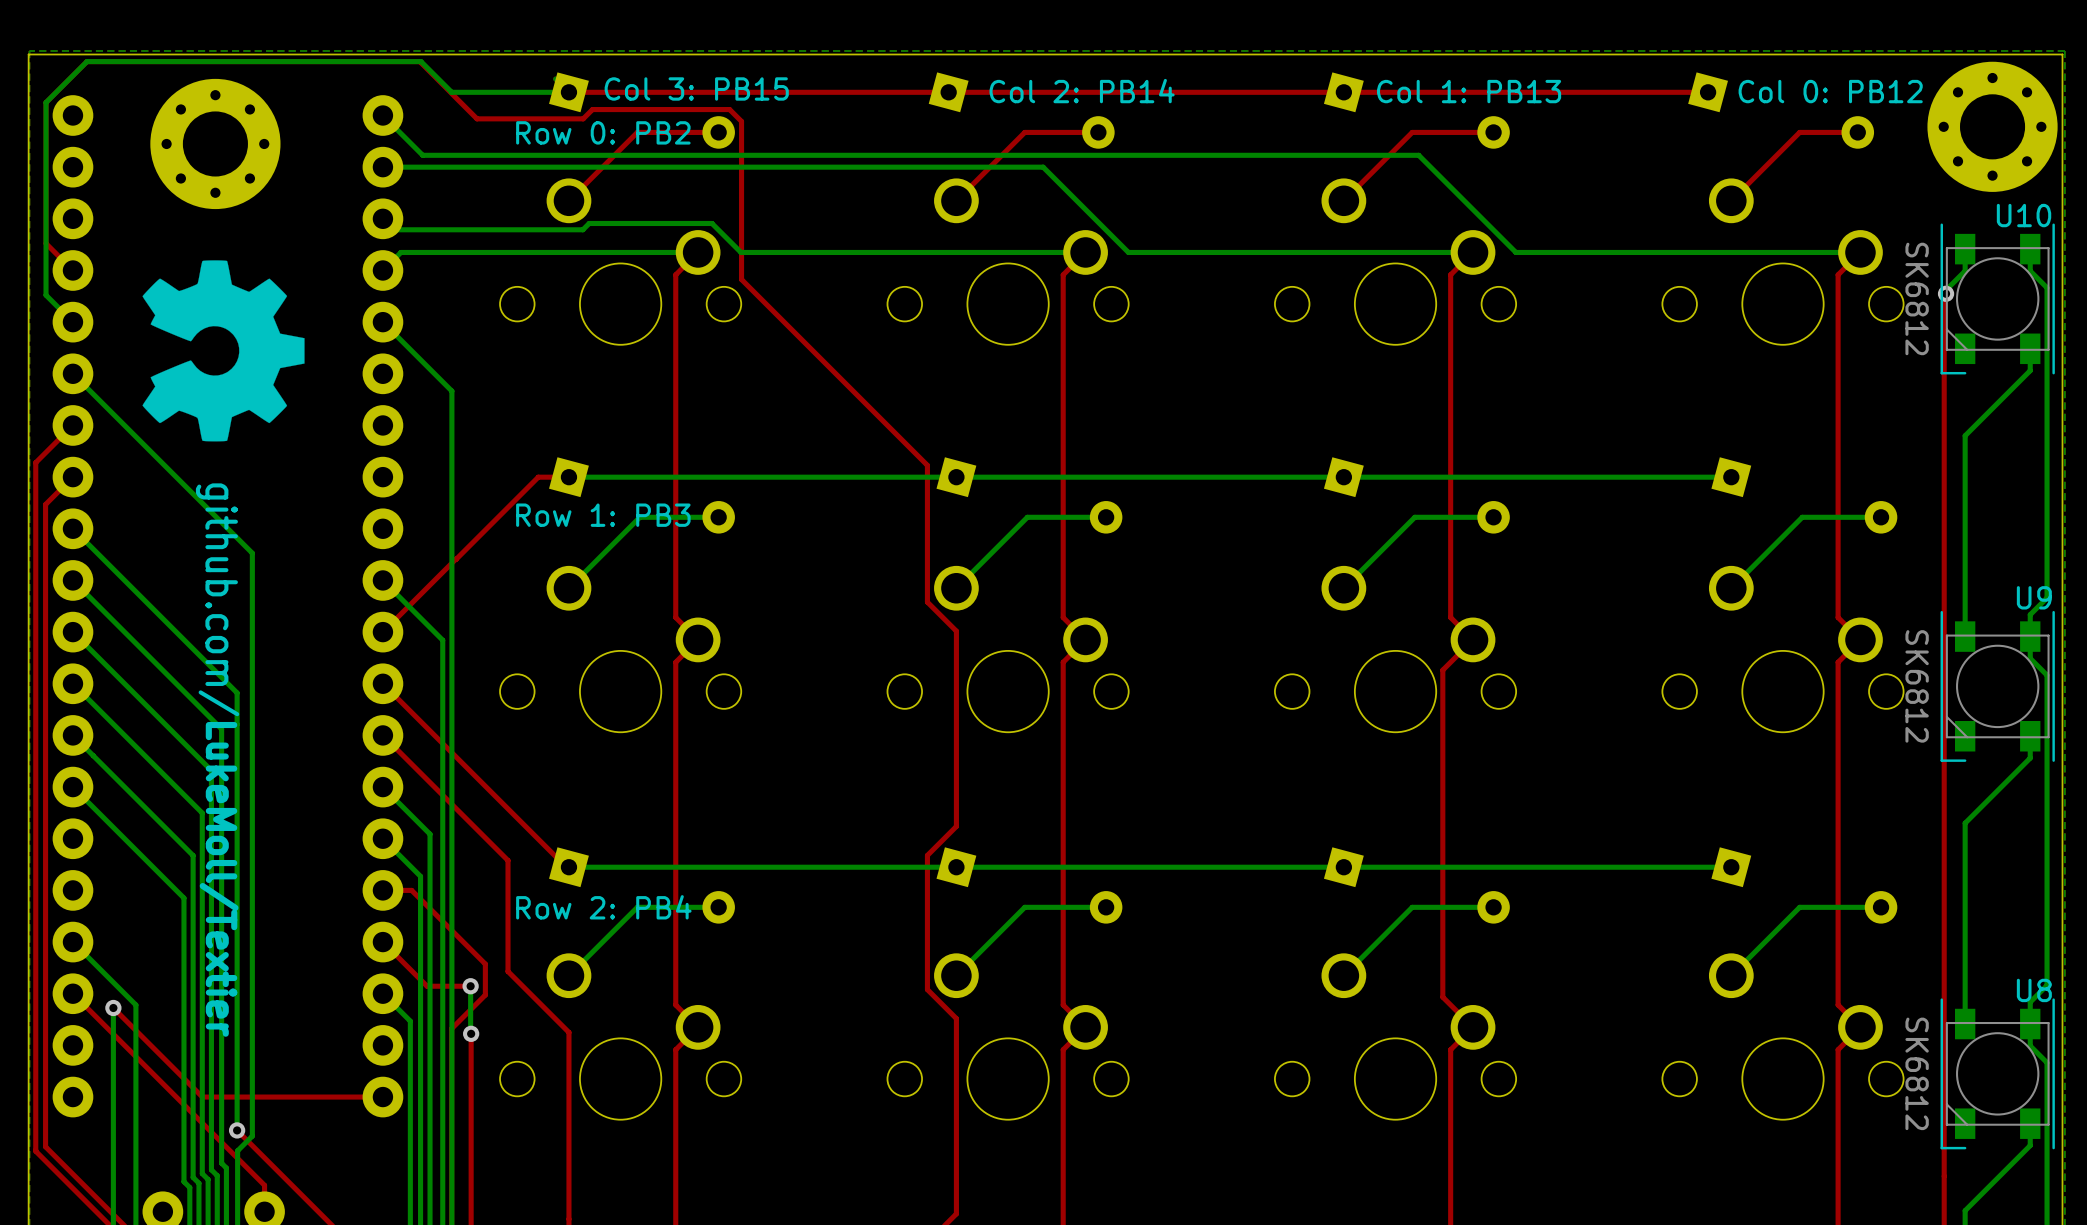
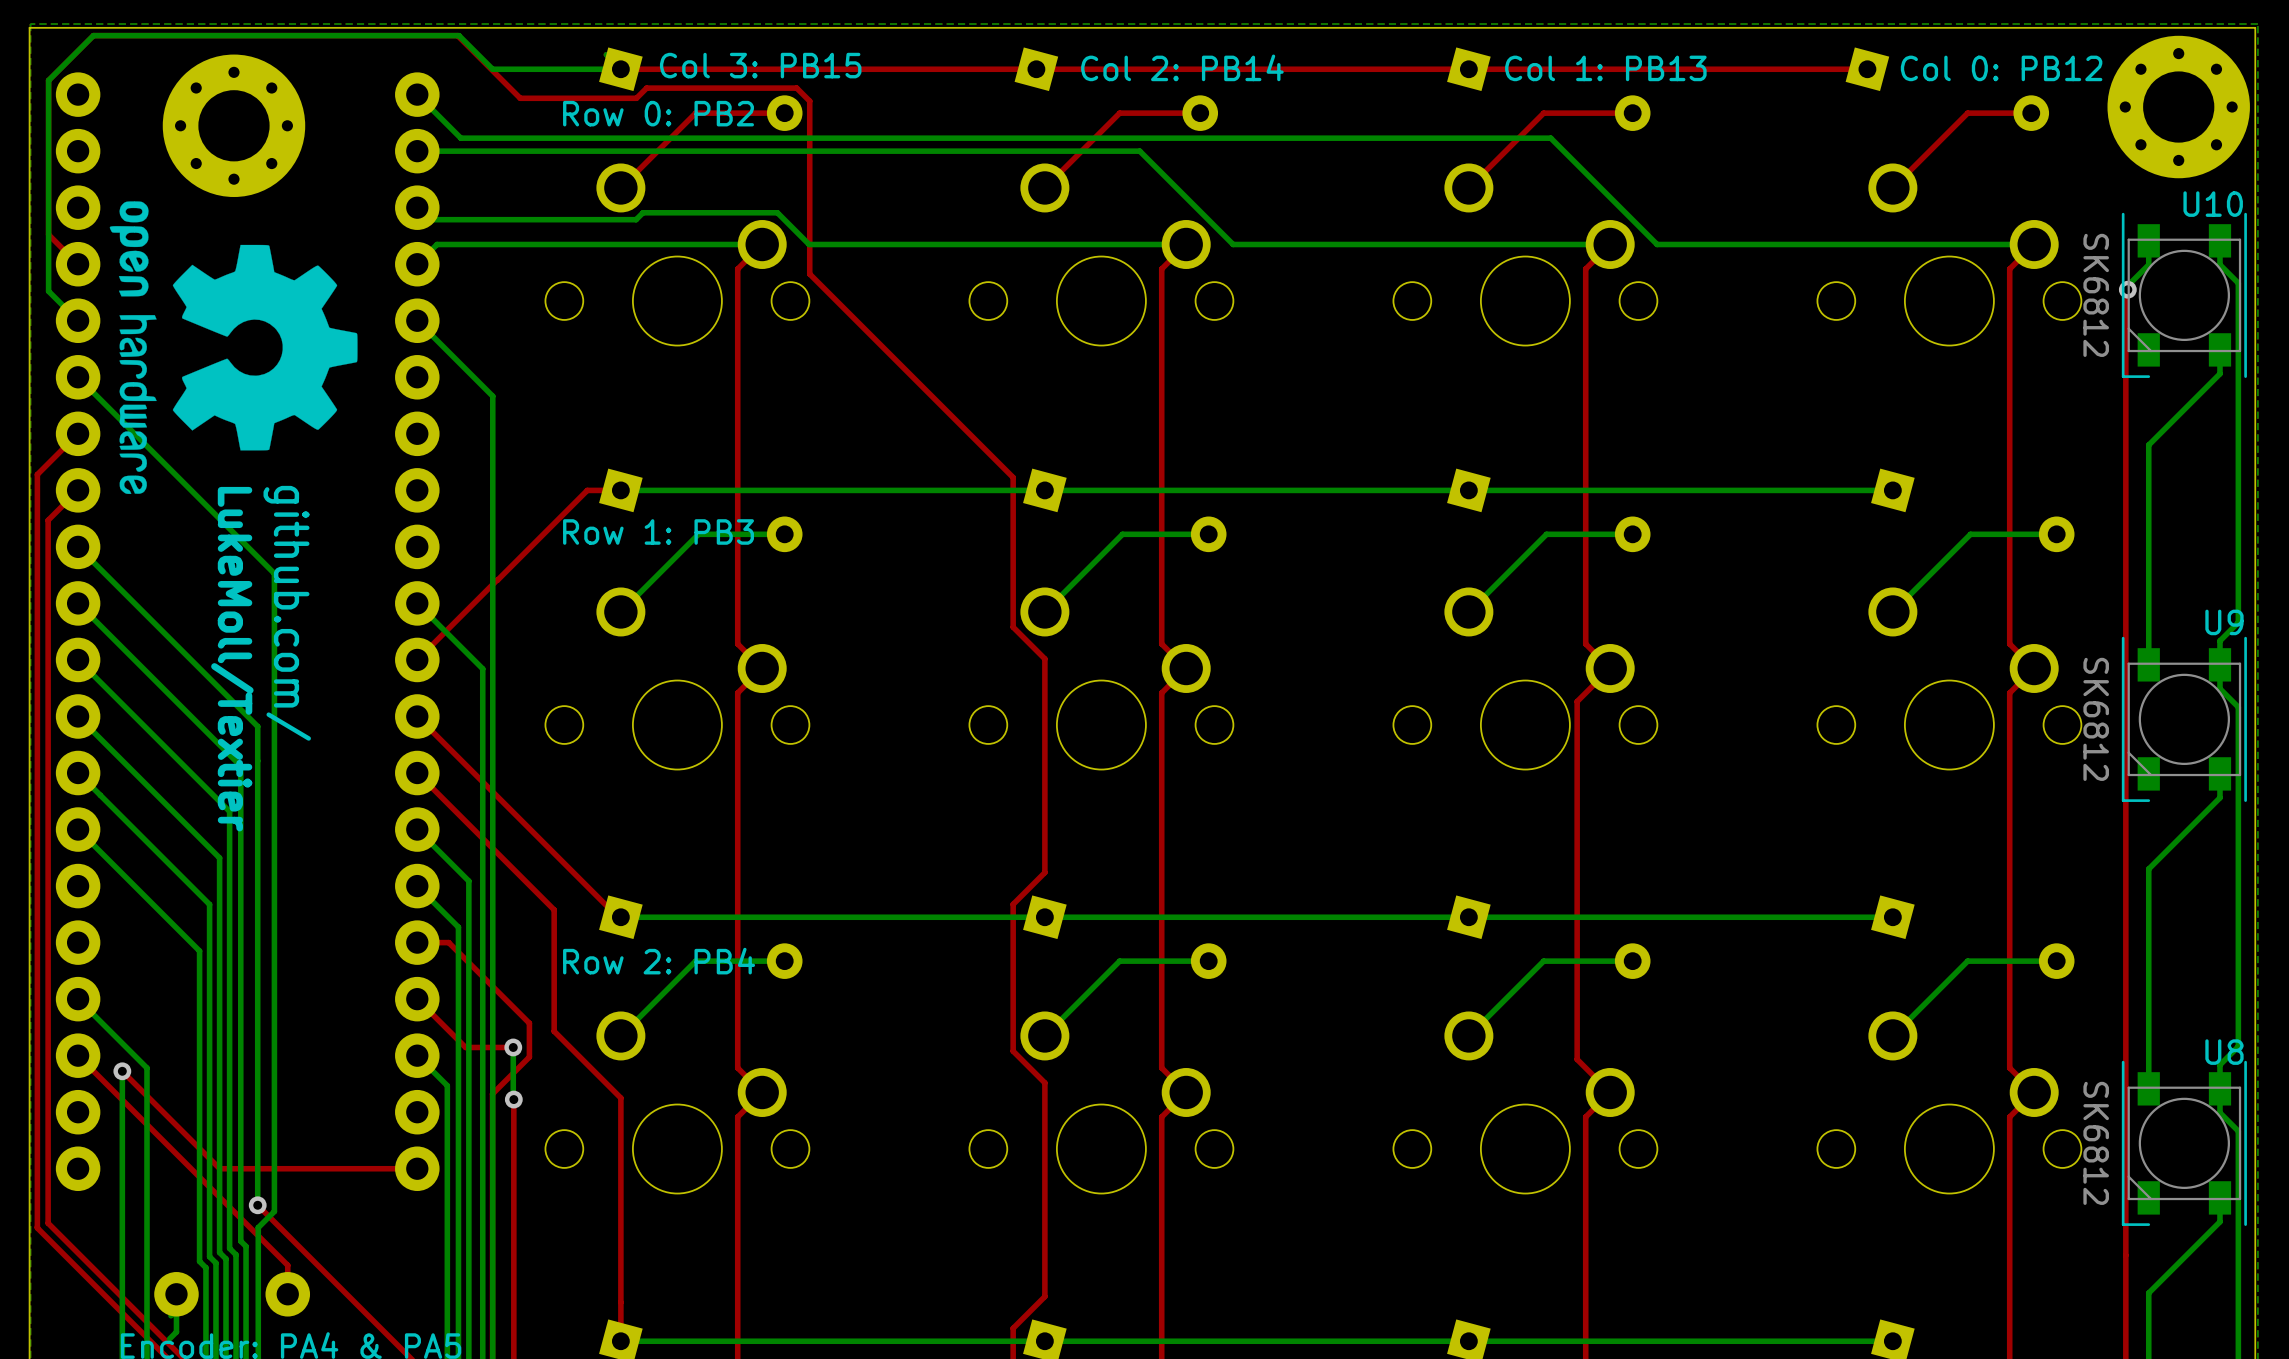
drawing shape: [142, 260, 305, 442] -> [109, 201, 358, 494]
text position: github.com/ (217, 599) -> github.com/ (287, 613)
text position: LukeMoll/Textier (219, 879) -> LukeMoll/Textier (232, 659)

